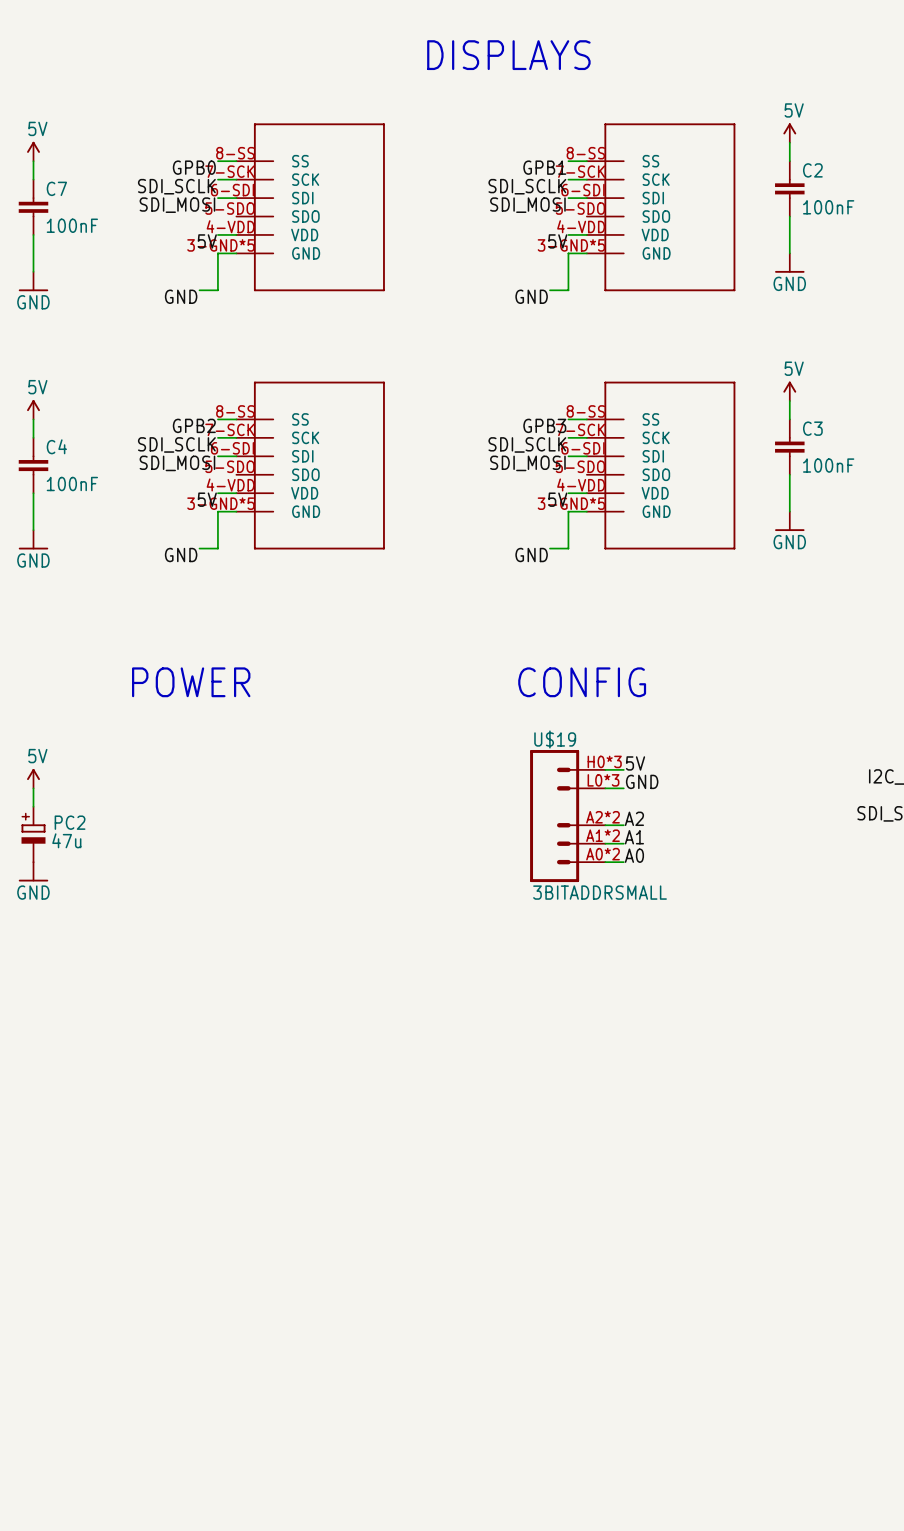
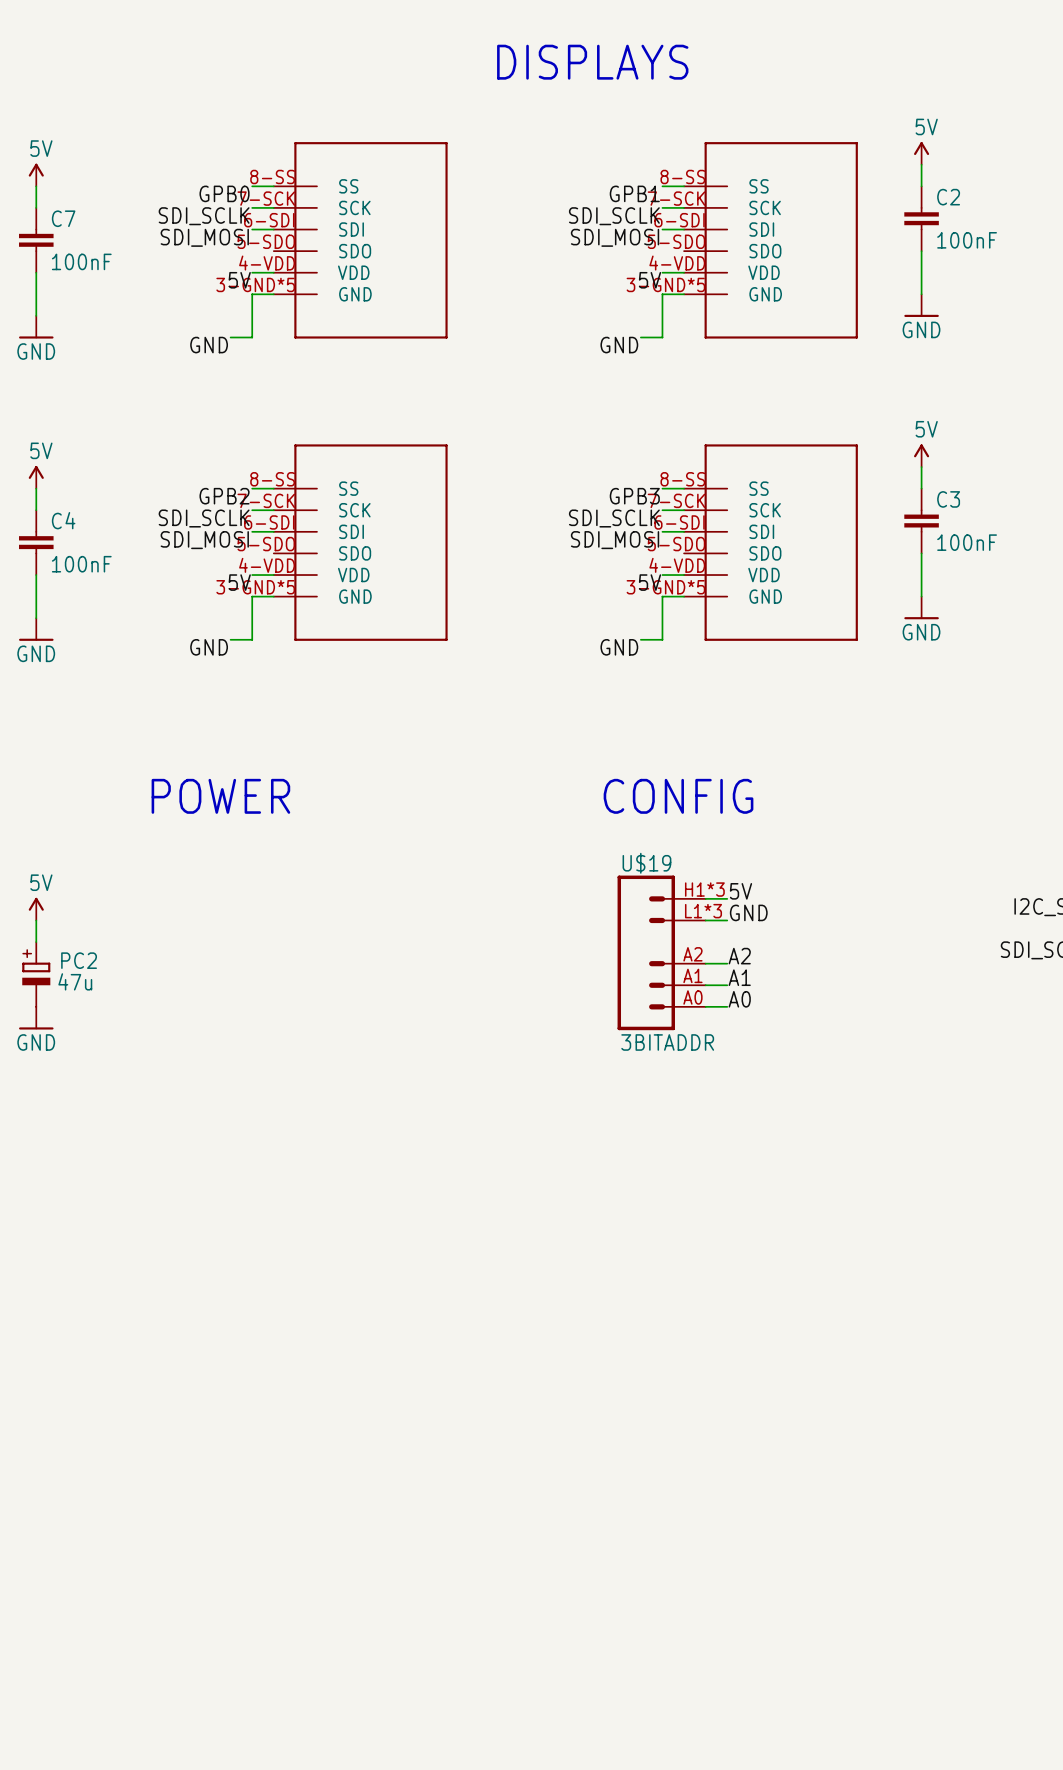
U$19 pin number: H0*3 (604, 761) -> H1*3 (704, 889)
U$19 pin number: L0*3 (603, 780) -> L1*3 (703, 911)
U$19 pin number: A2*2 (603, 817) -> A2 (692, 954)
U$19 pin number: A1*2 (603, 835) -> A1 (692, 975)
U$19 pin number: A0*2 (603, 854) -> A0 (692, 997)
U$19 value: 3BITADDRSMALL (600, 892) -> 3BITADDR (667, 1042)

